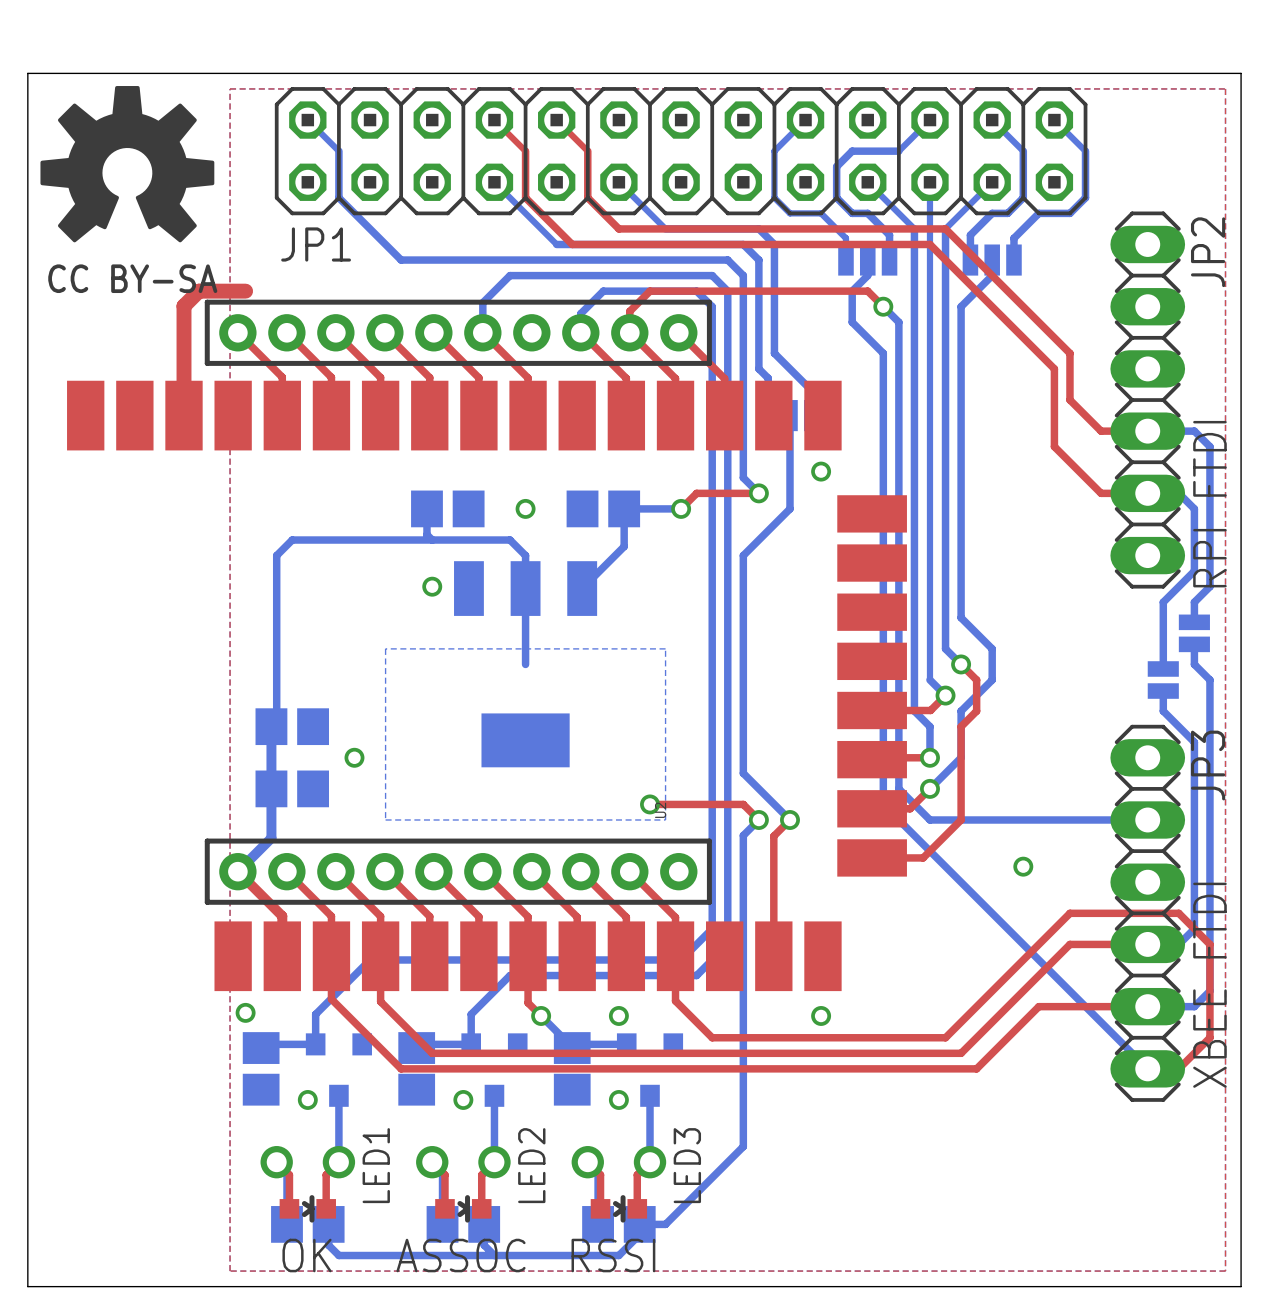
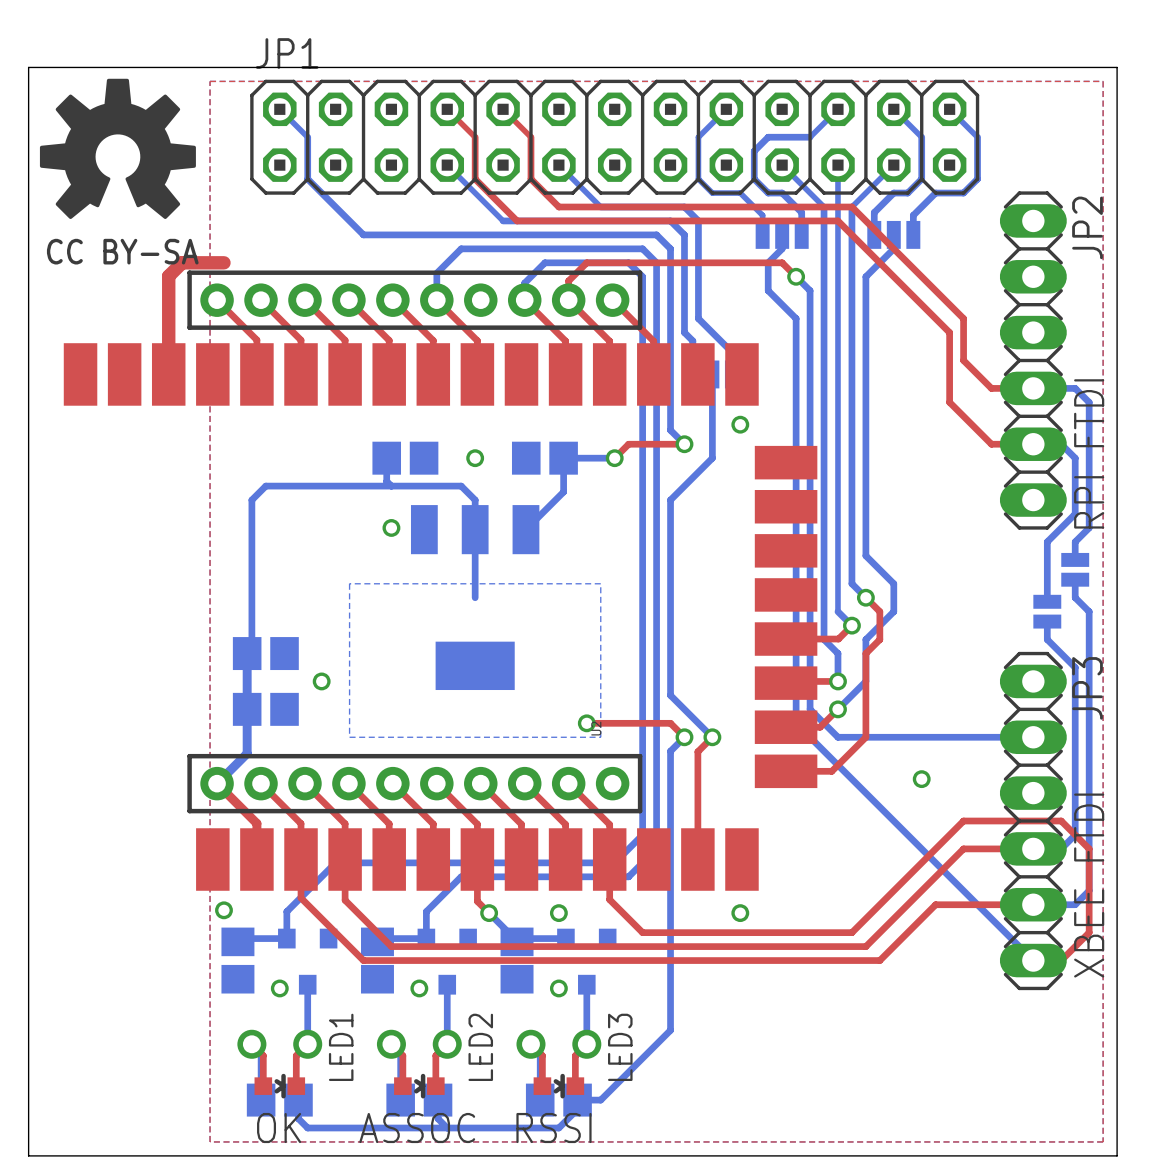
JP1 name position: JP1 (316, 244) -> JP1 (287, 53)

